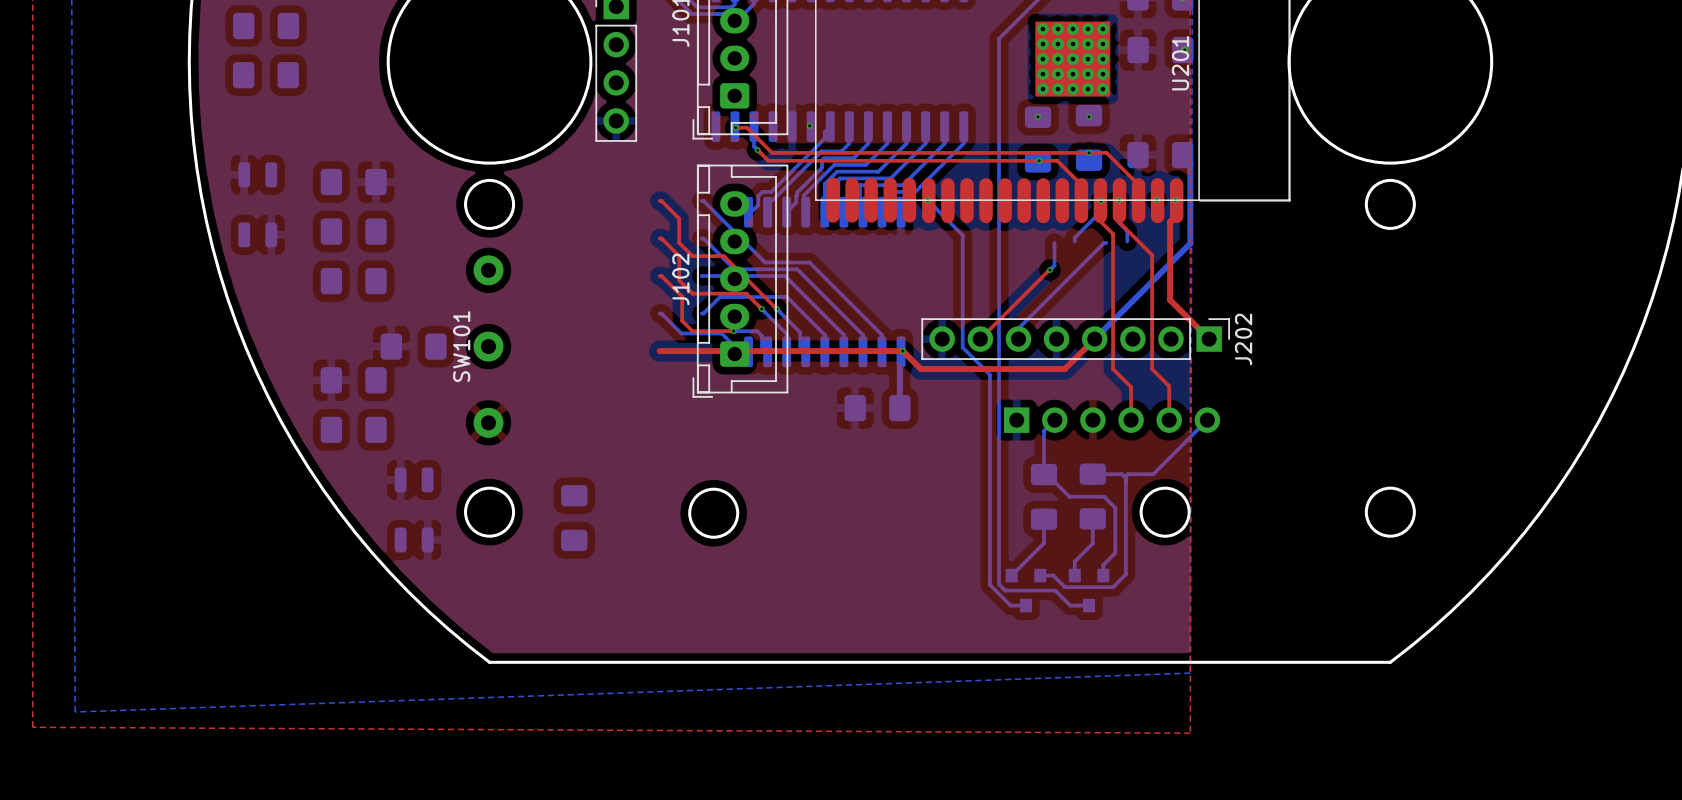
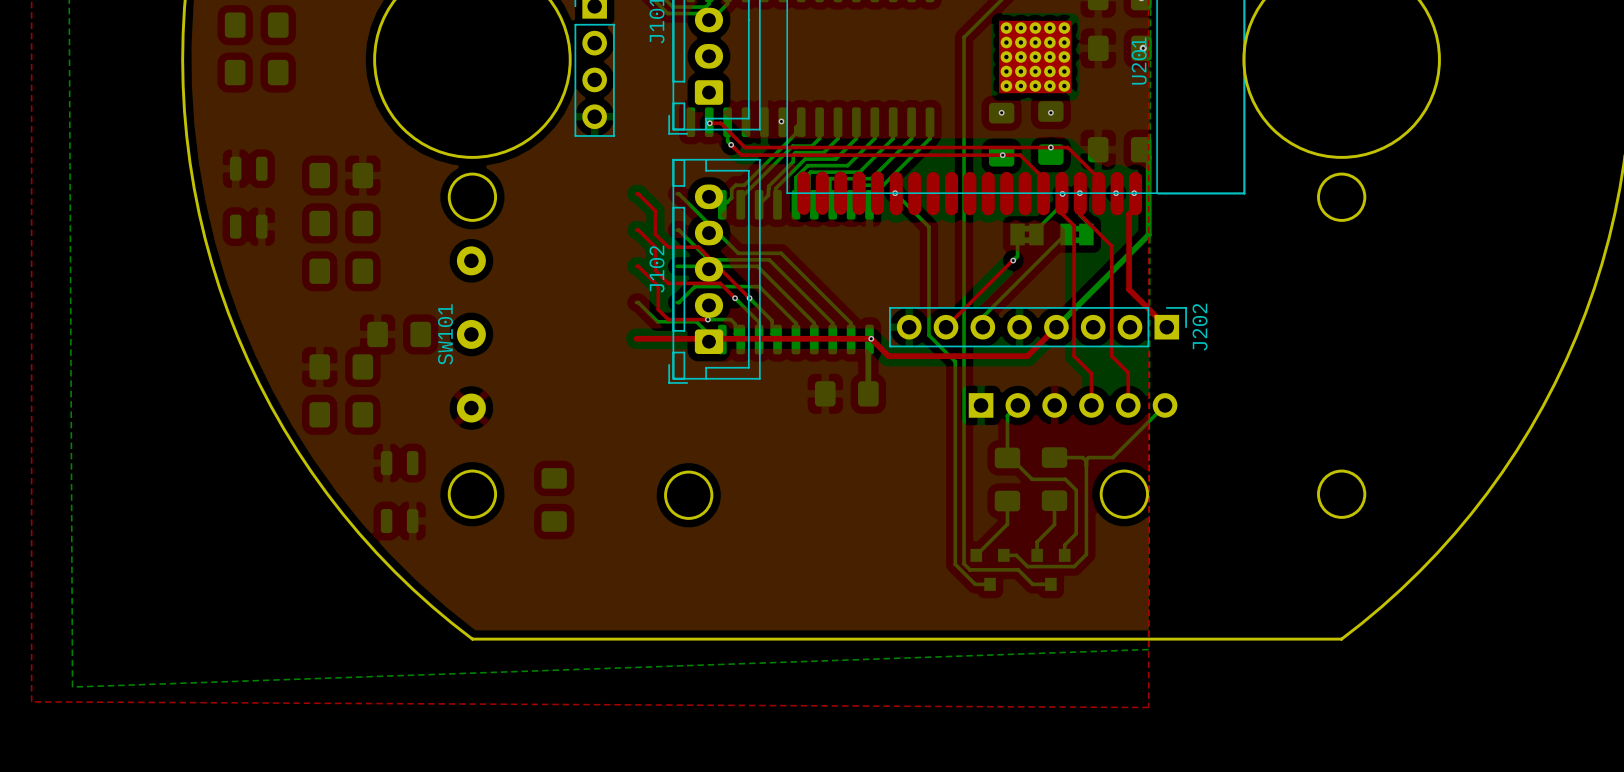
part: none -> (1026, 234)
part: none -> (1076, 234)

